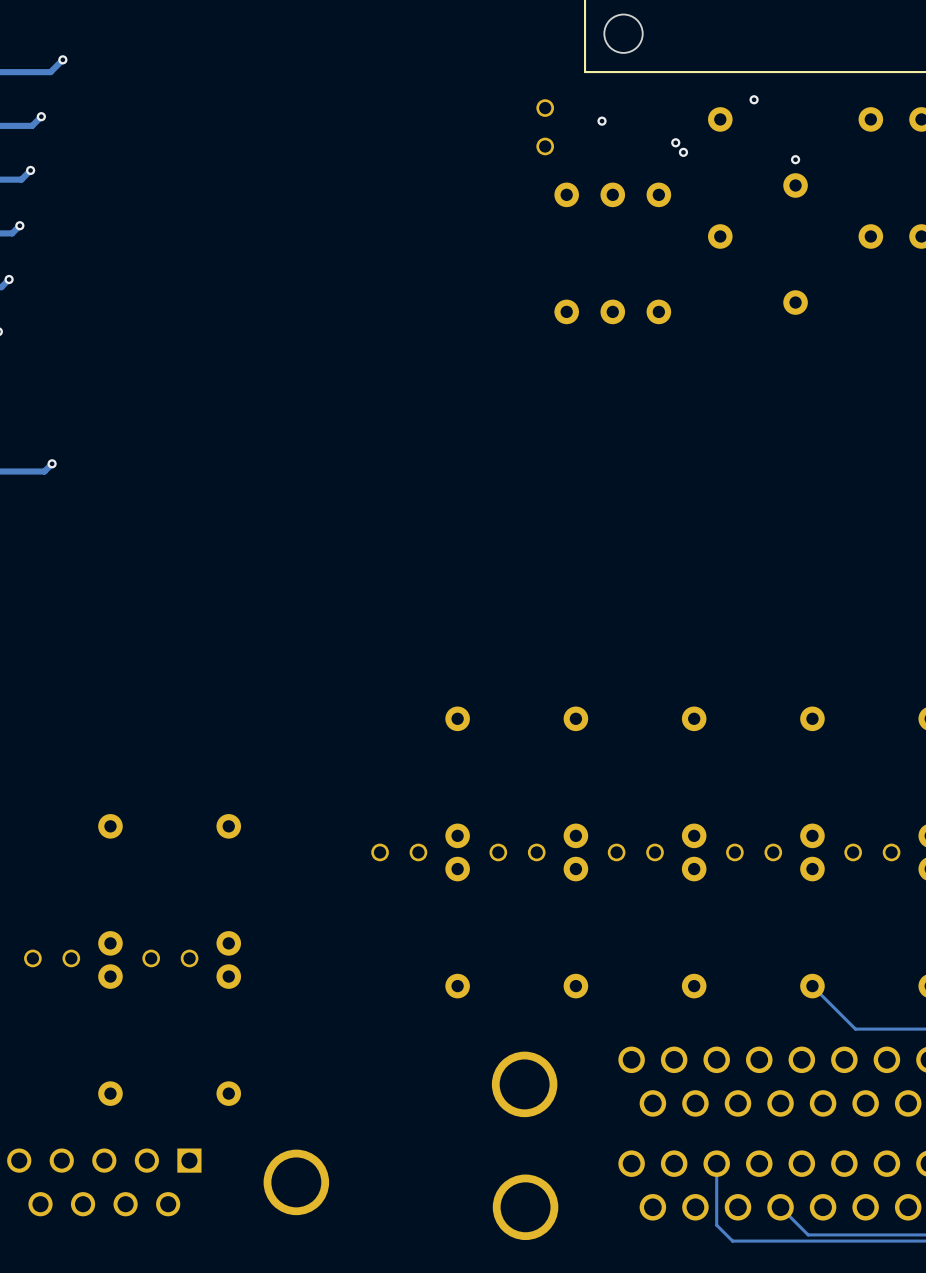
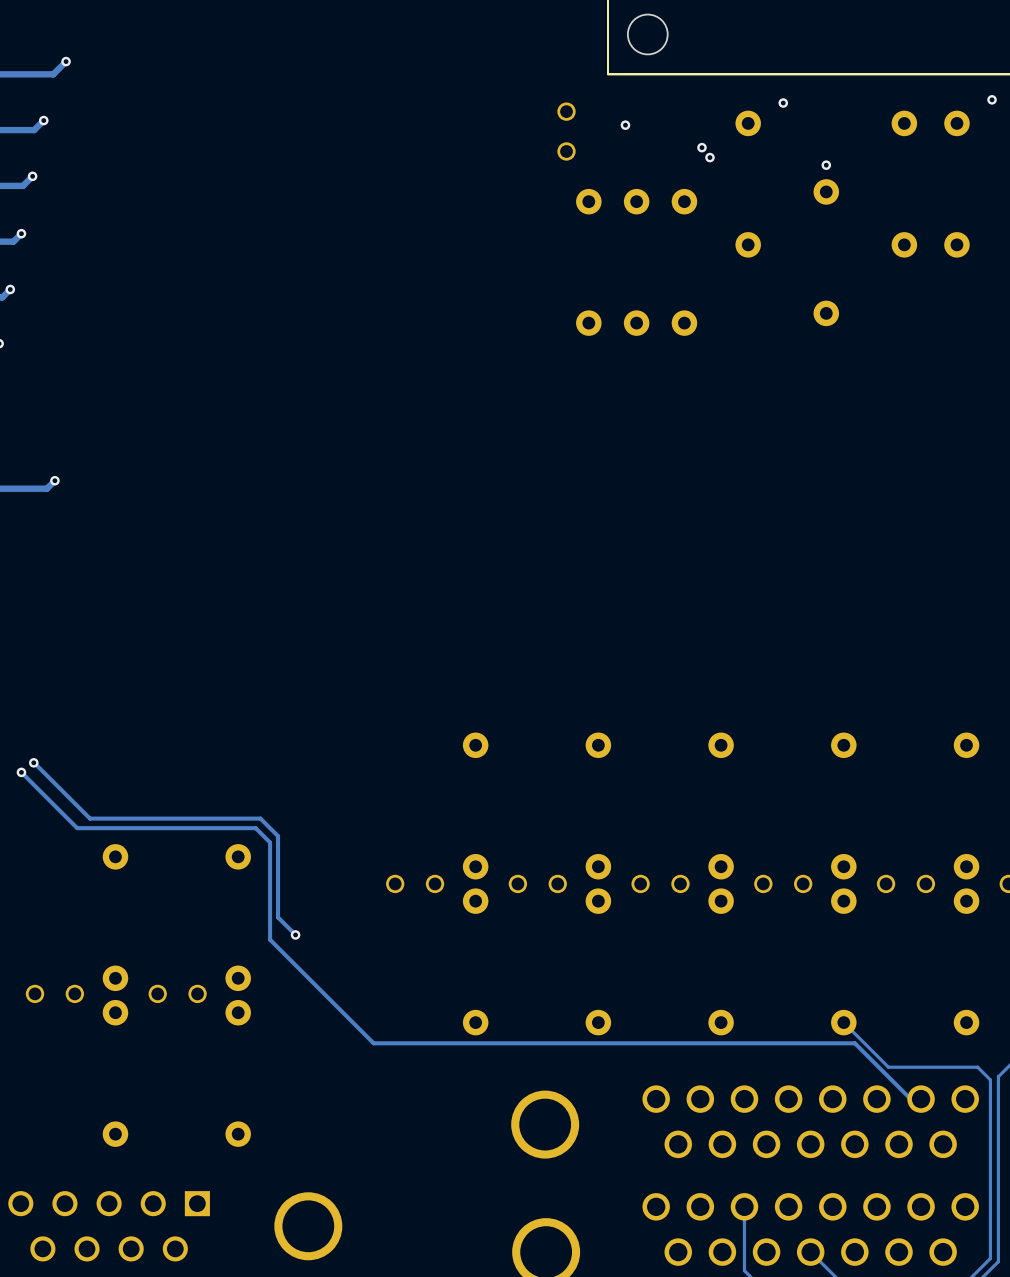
track: none -> (33, 762) (89, 818) (260, 818) (278, 836) (278, 917) (295, 934)
via: none -> (33, 762)
track: none -> (21, 772) (77, 828) (255, 828) (270, 842) (270, 939) (373, 1043) (854, 1043) (910, 1099) (921, 1099)
via: none -> (21, 772)
via: none -> (295, 934)

